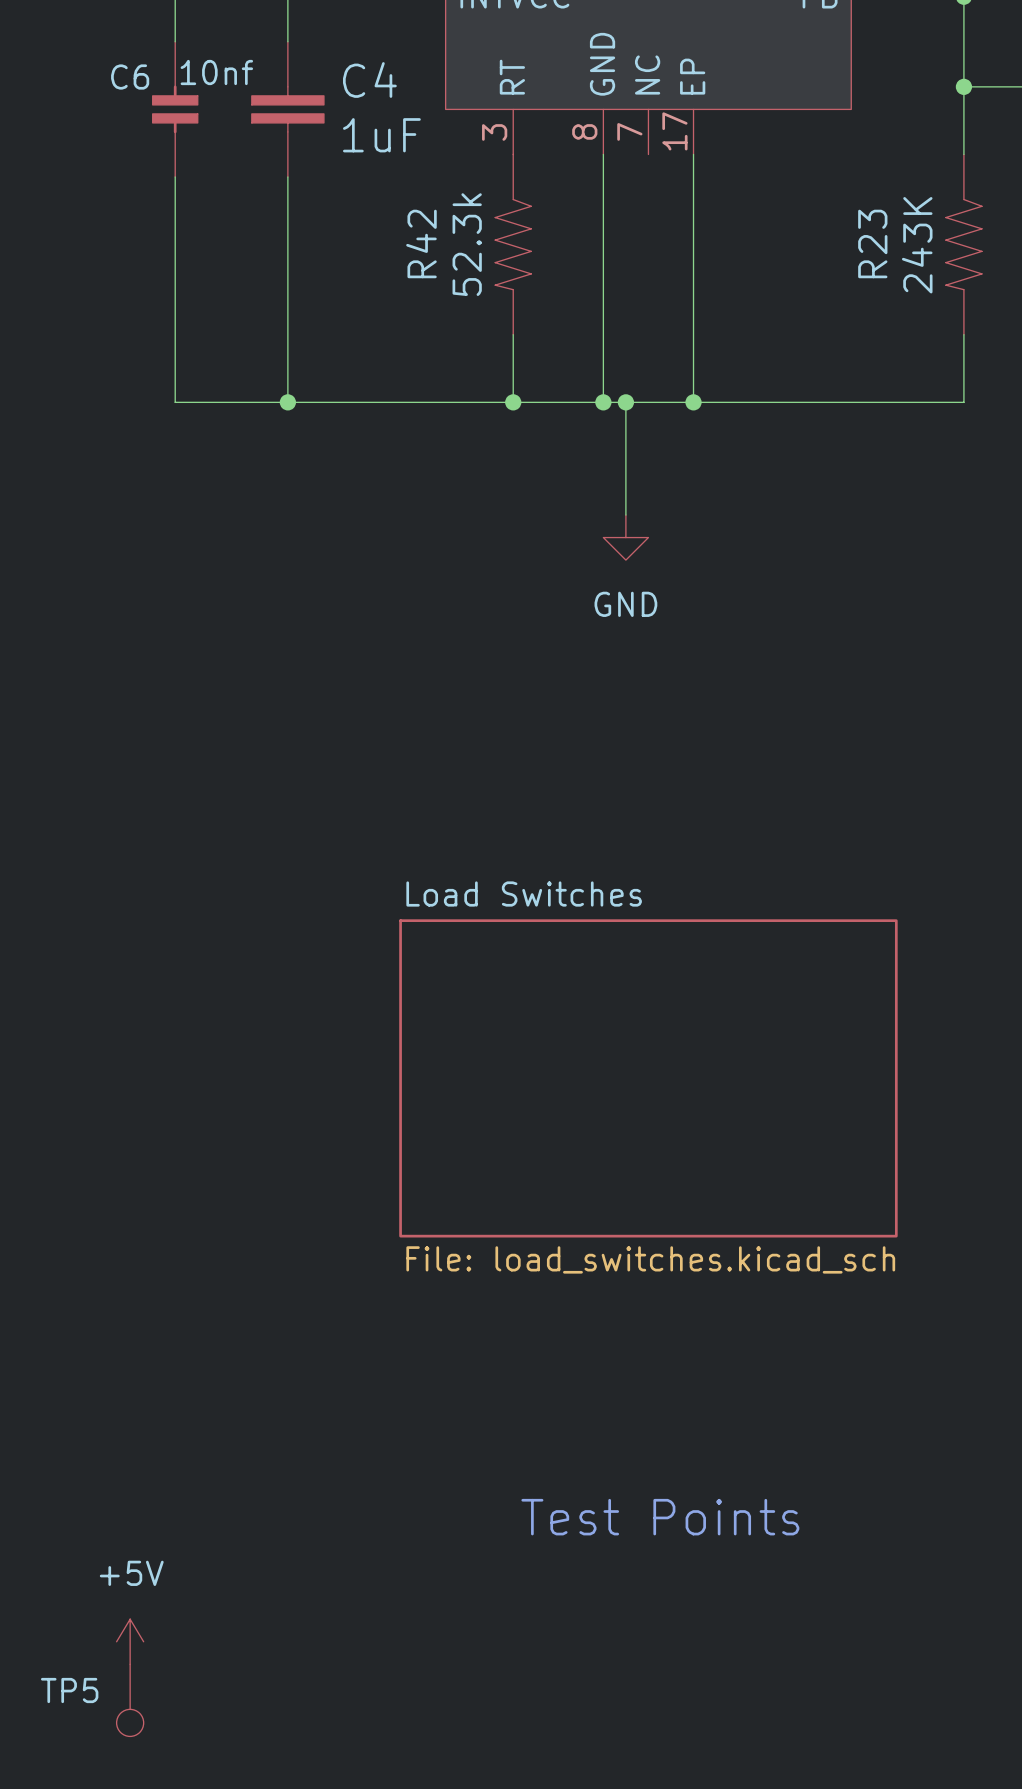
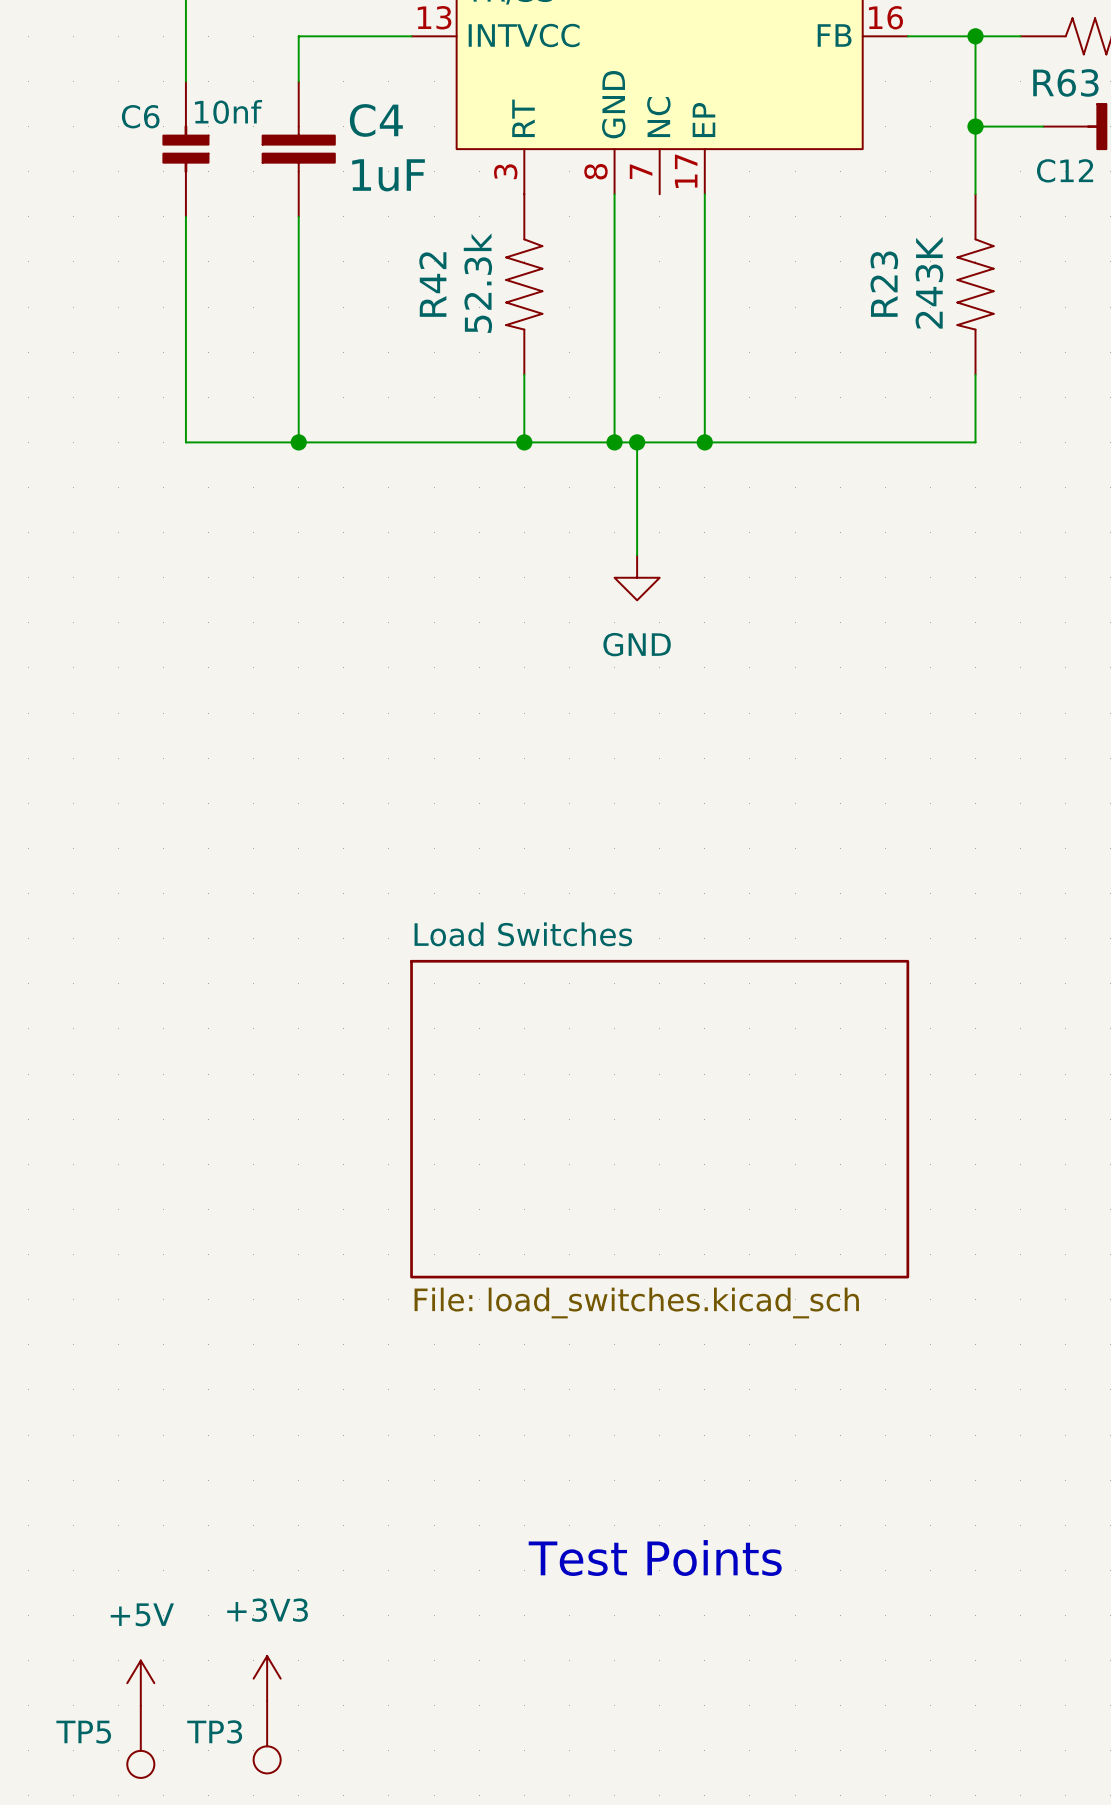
power symbol: none -> +3V3 (267, 1678)
TP3: none -> (267, 1737)

